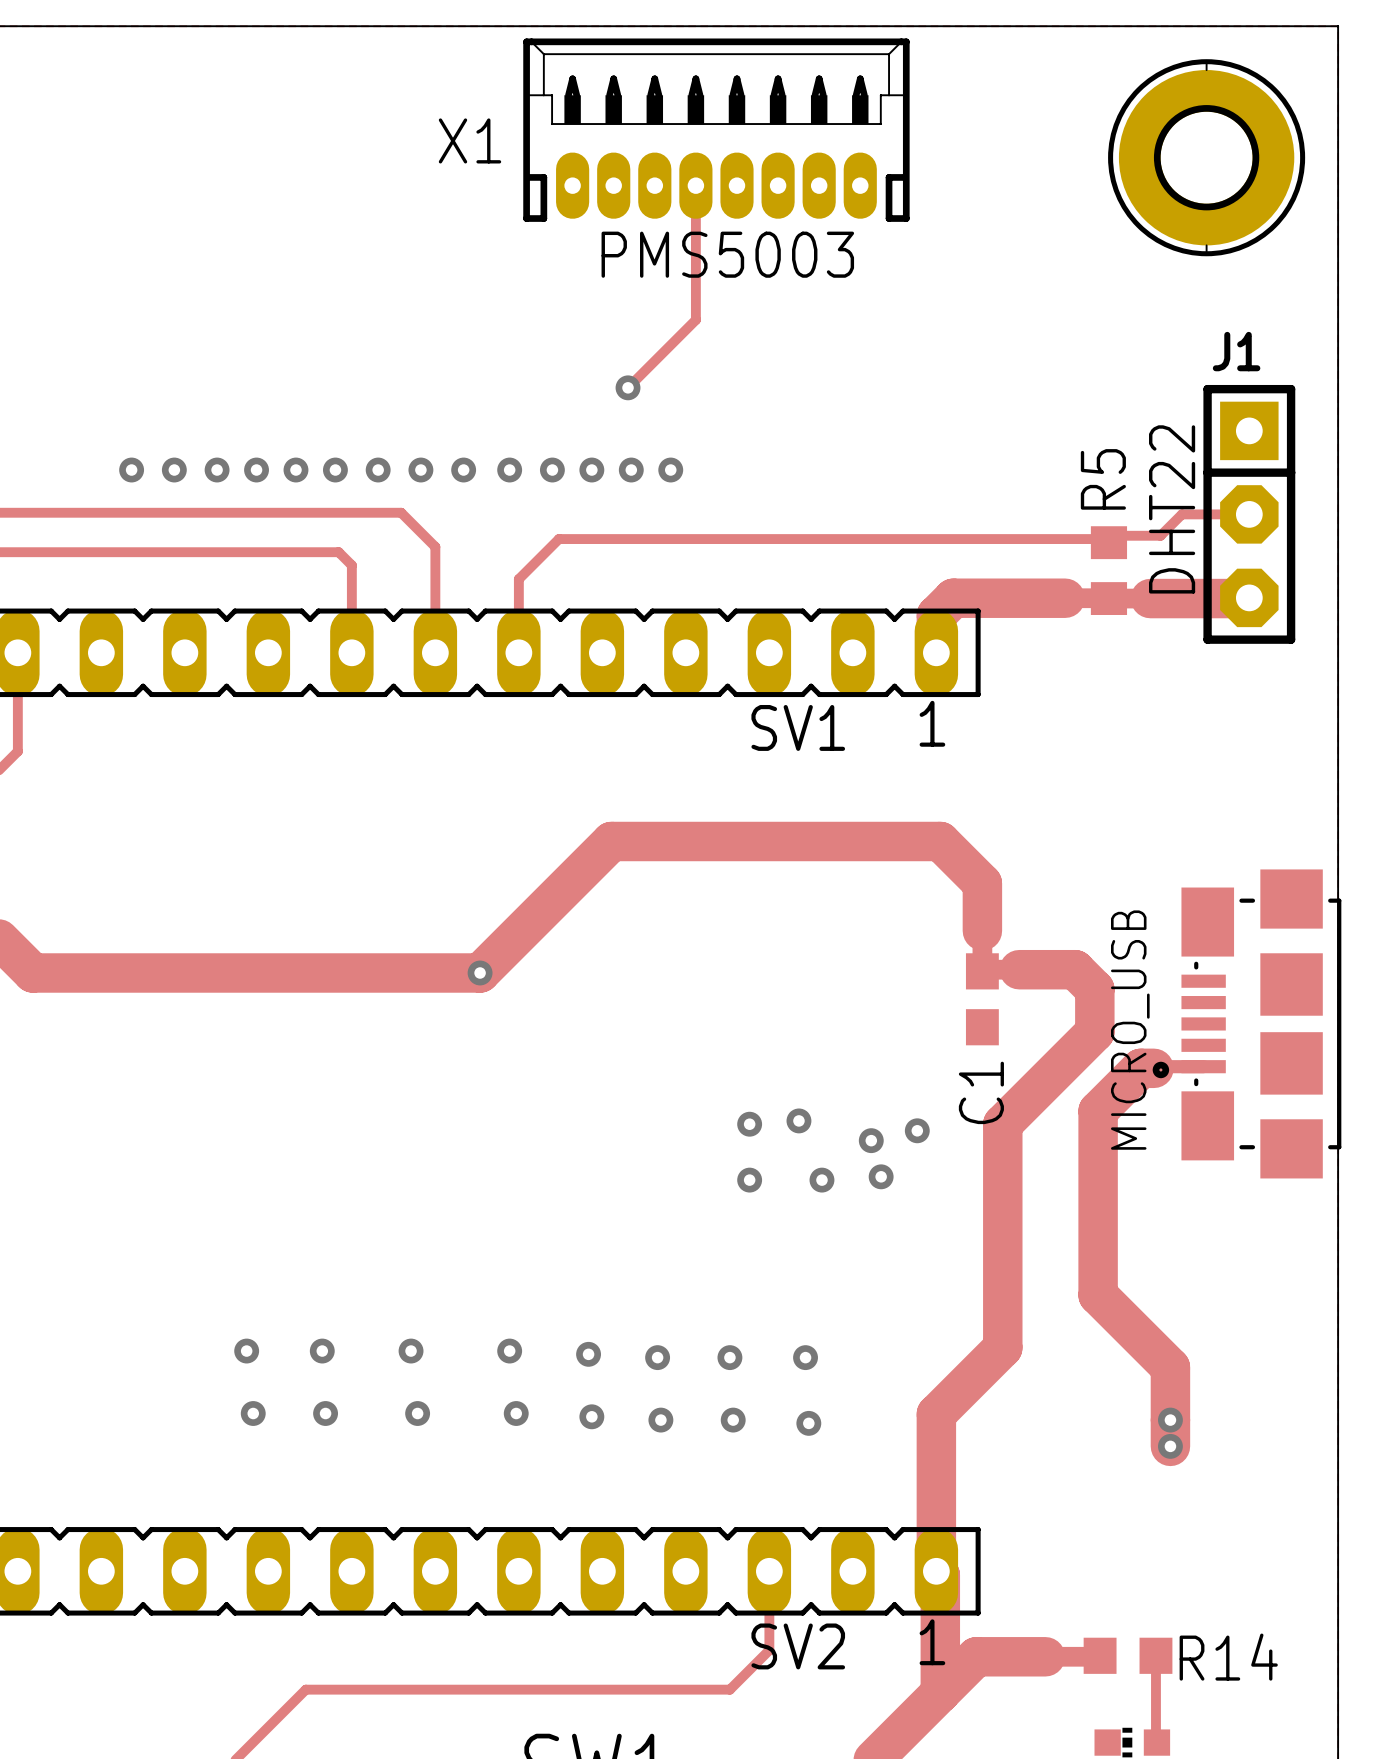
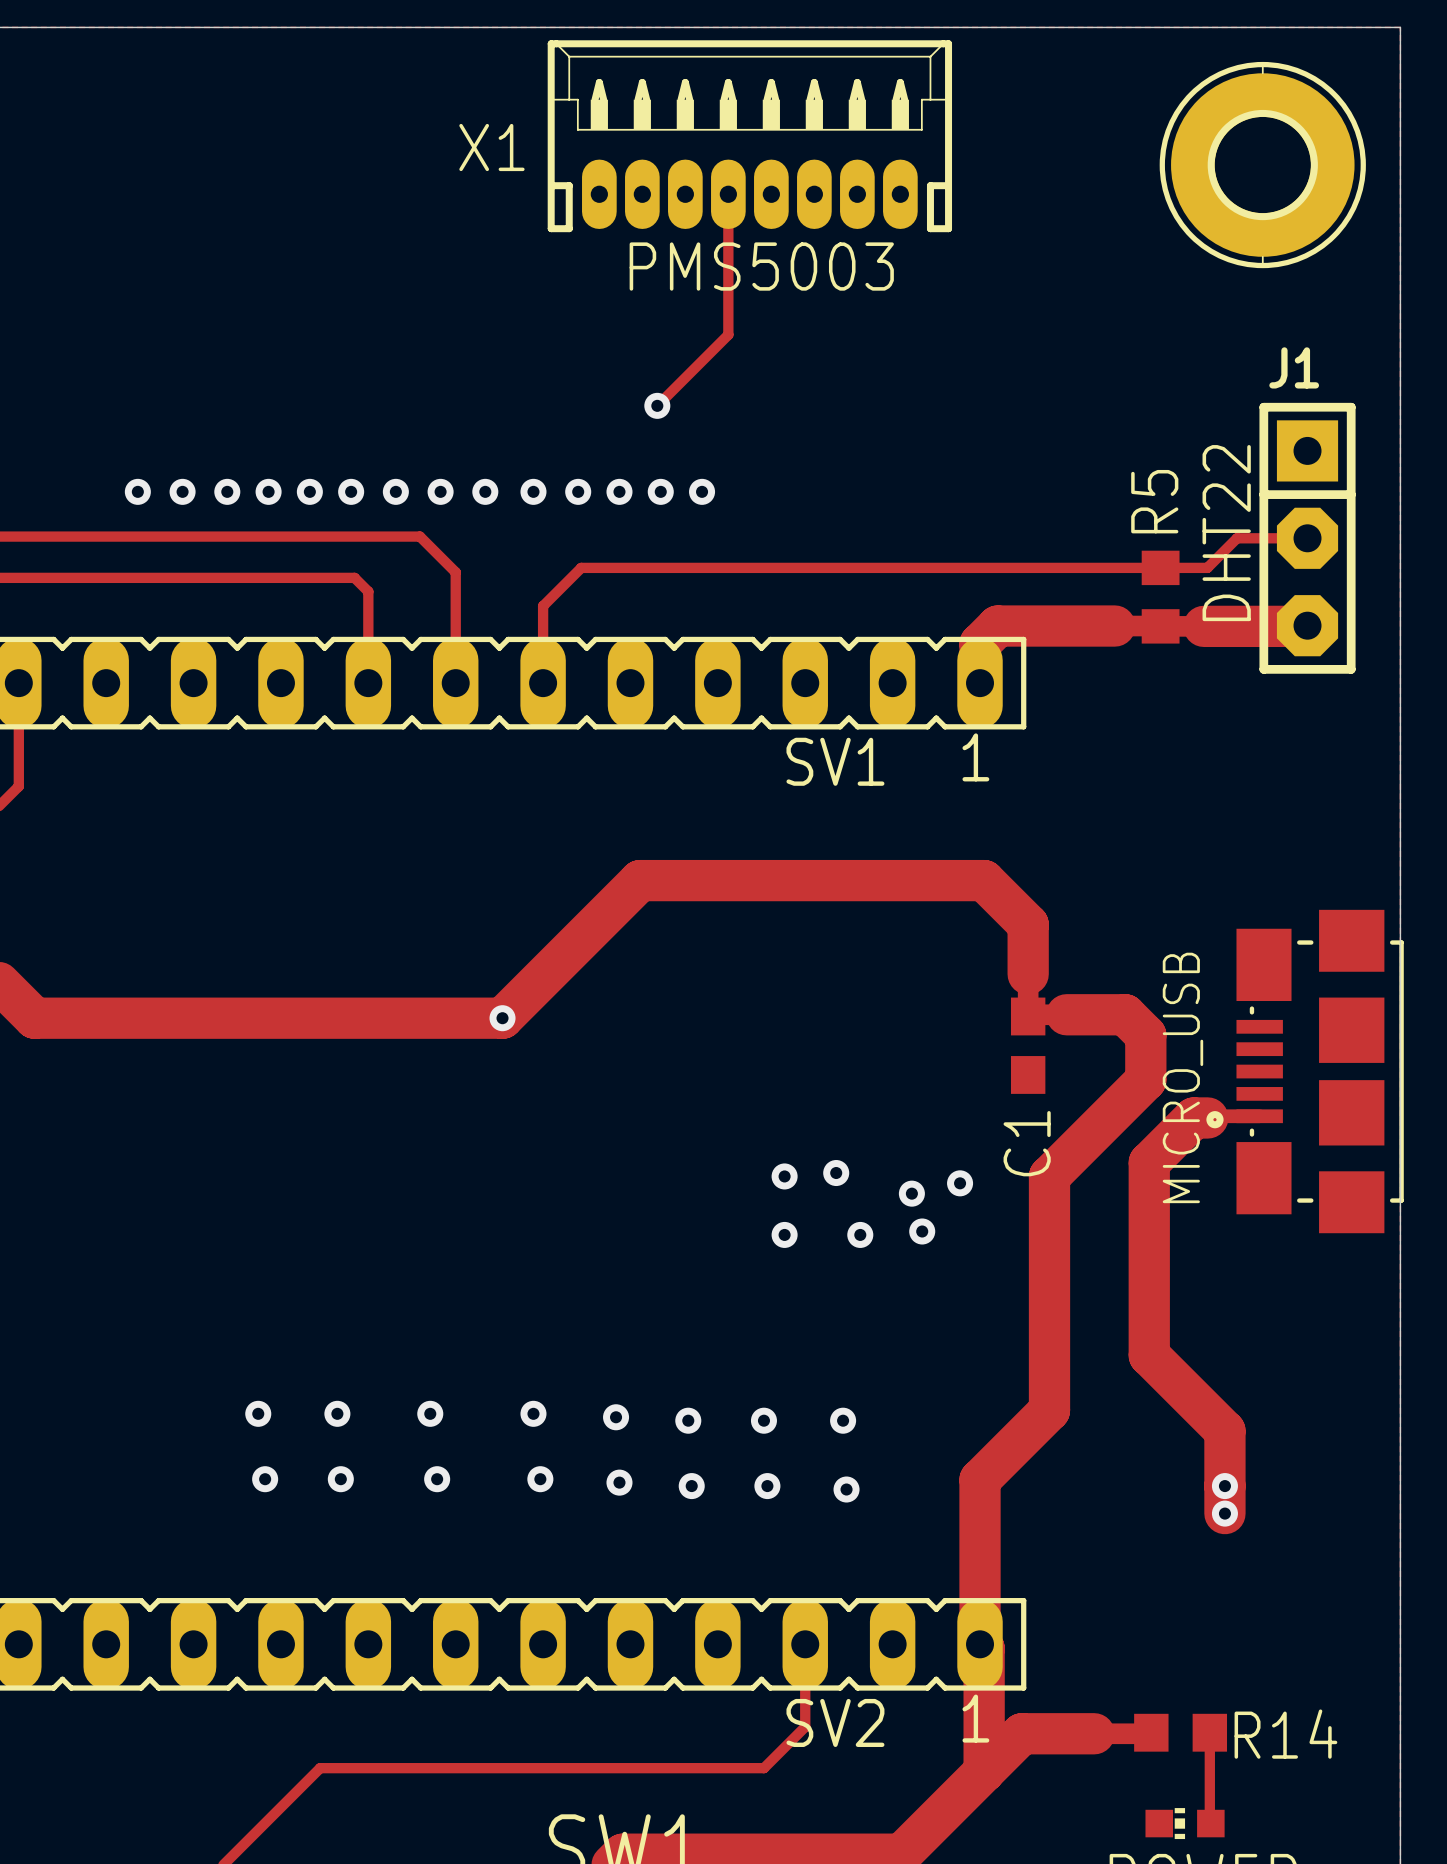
track: (1160, 535) (1115, 535) (1108, 542) -> none
track: (555, 542) (558, 539) (1105, 539) (1108, 542) -> (581, 567) (1207, 567) (1214, 560)

